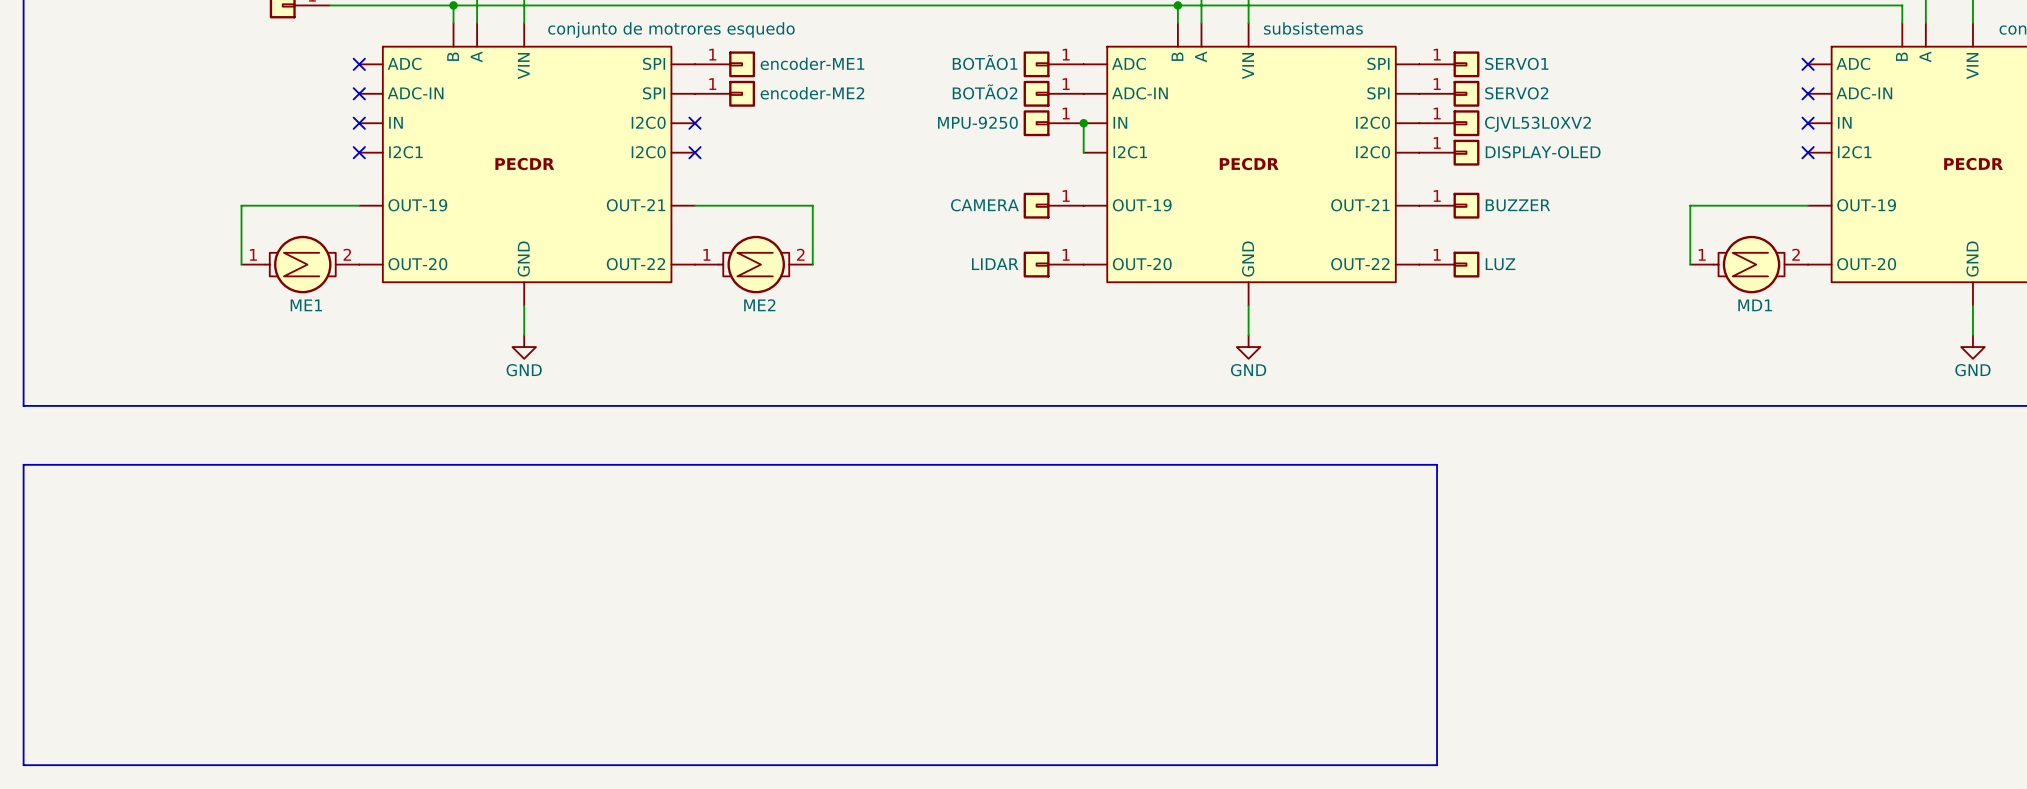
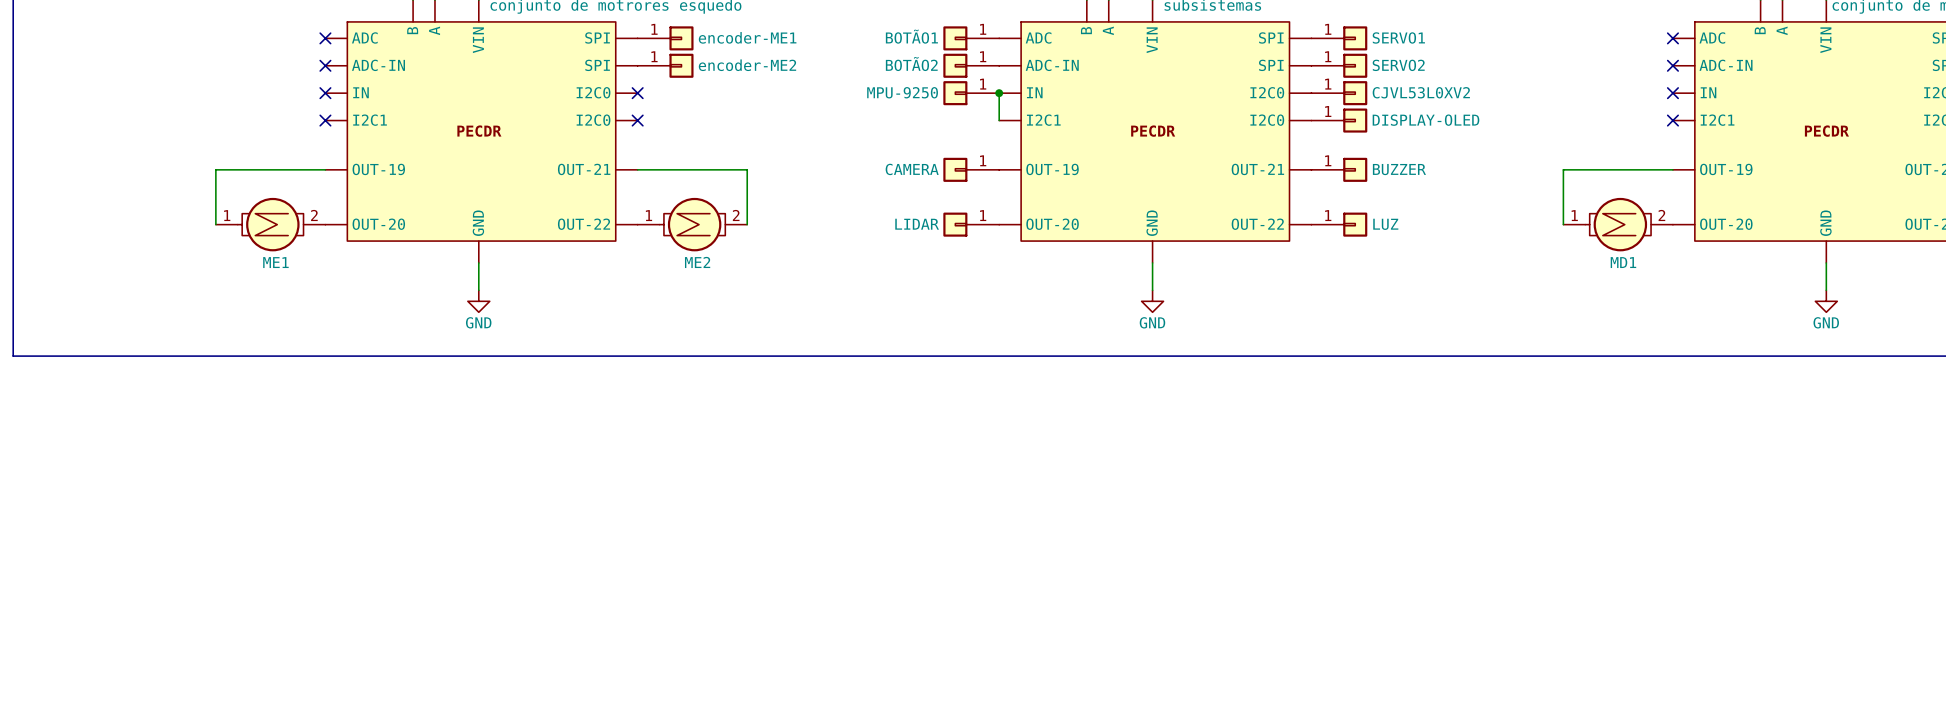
line: (23, 464) (1437, 464) (1437, 765) (23, 765) (23, 464) -> none

